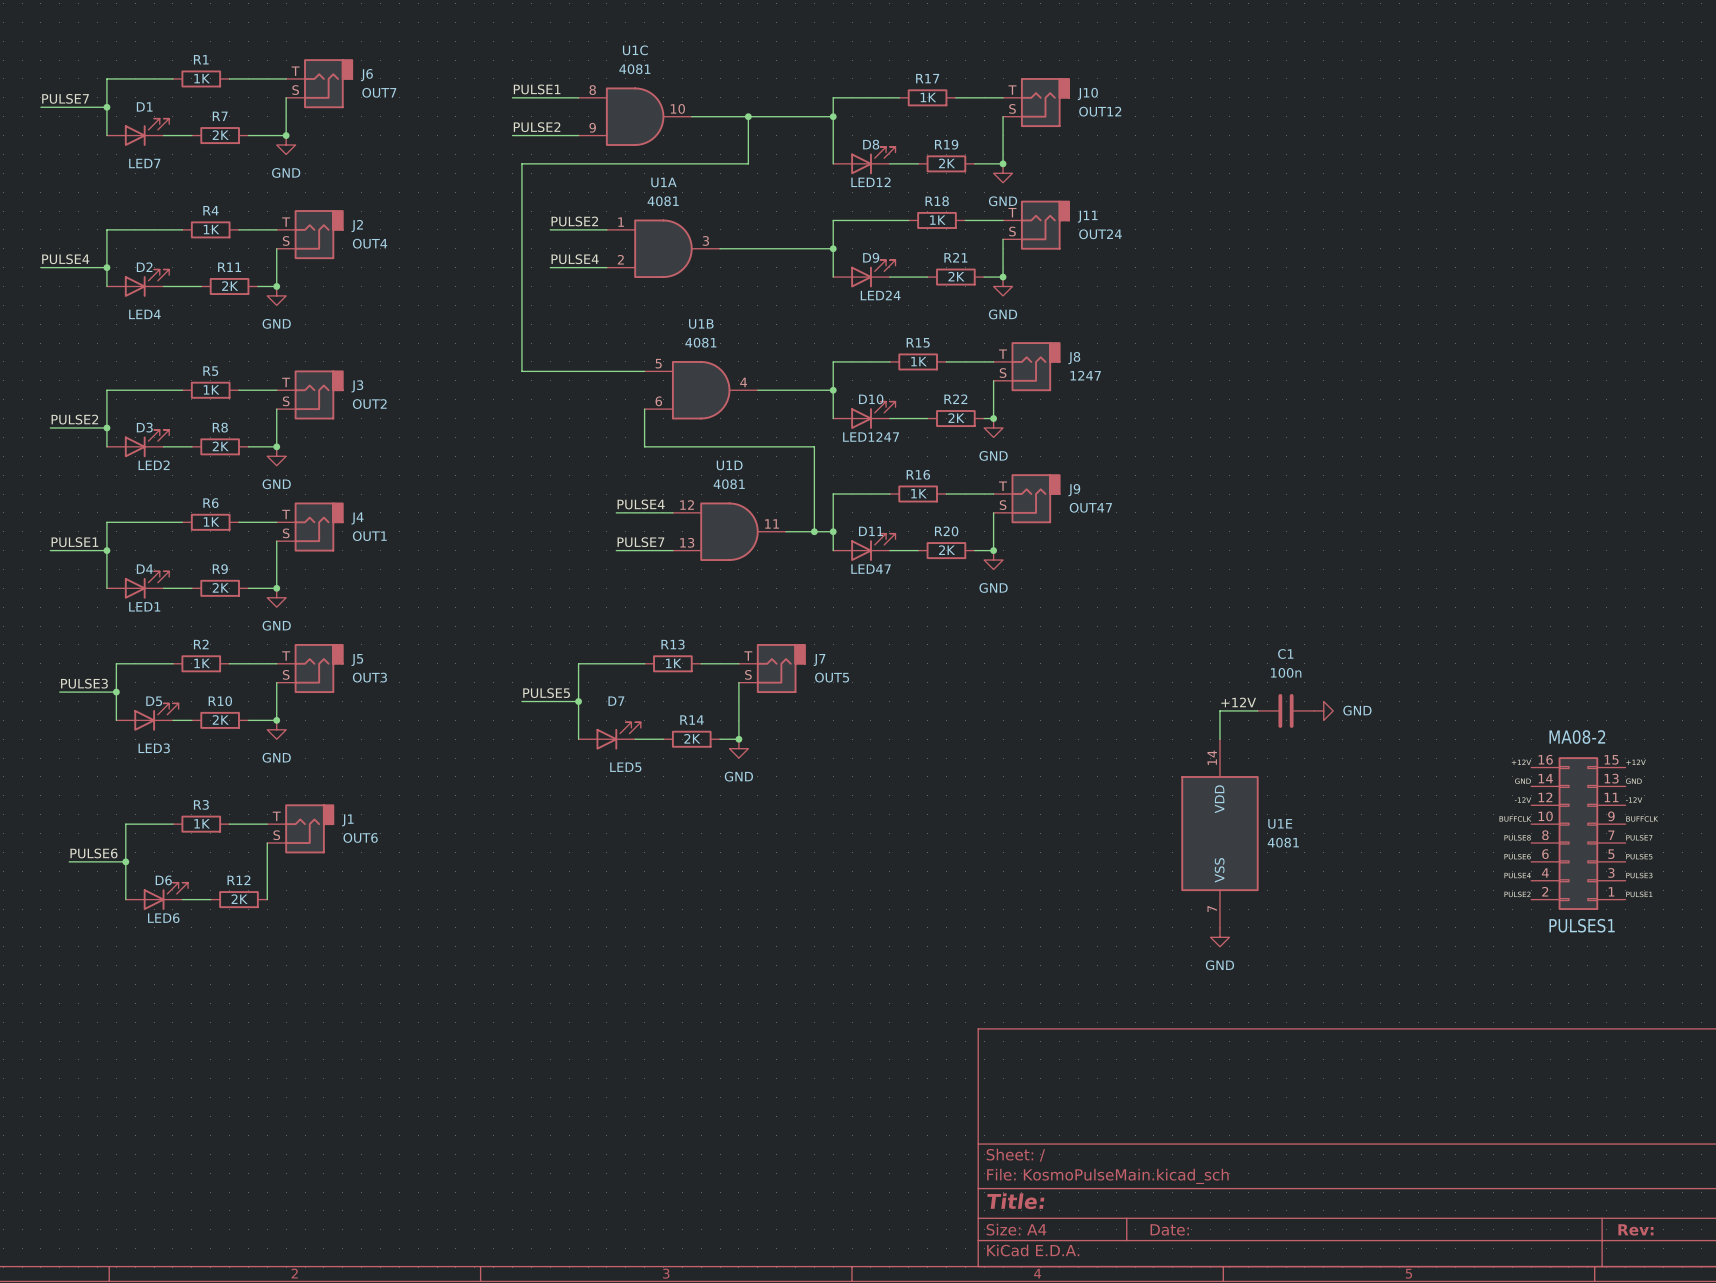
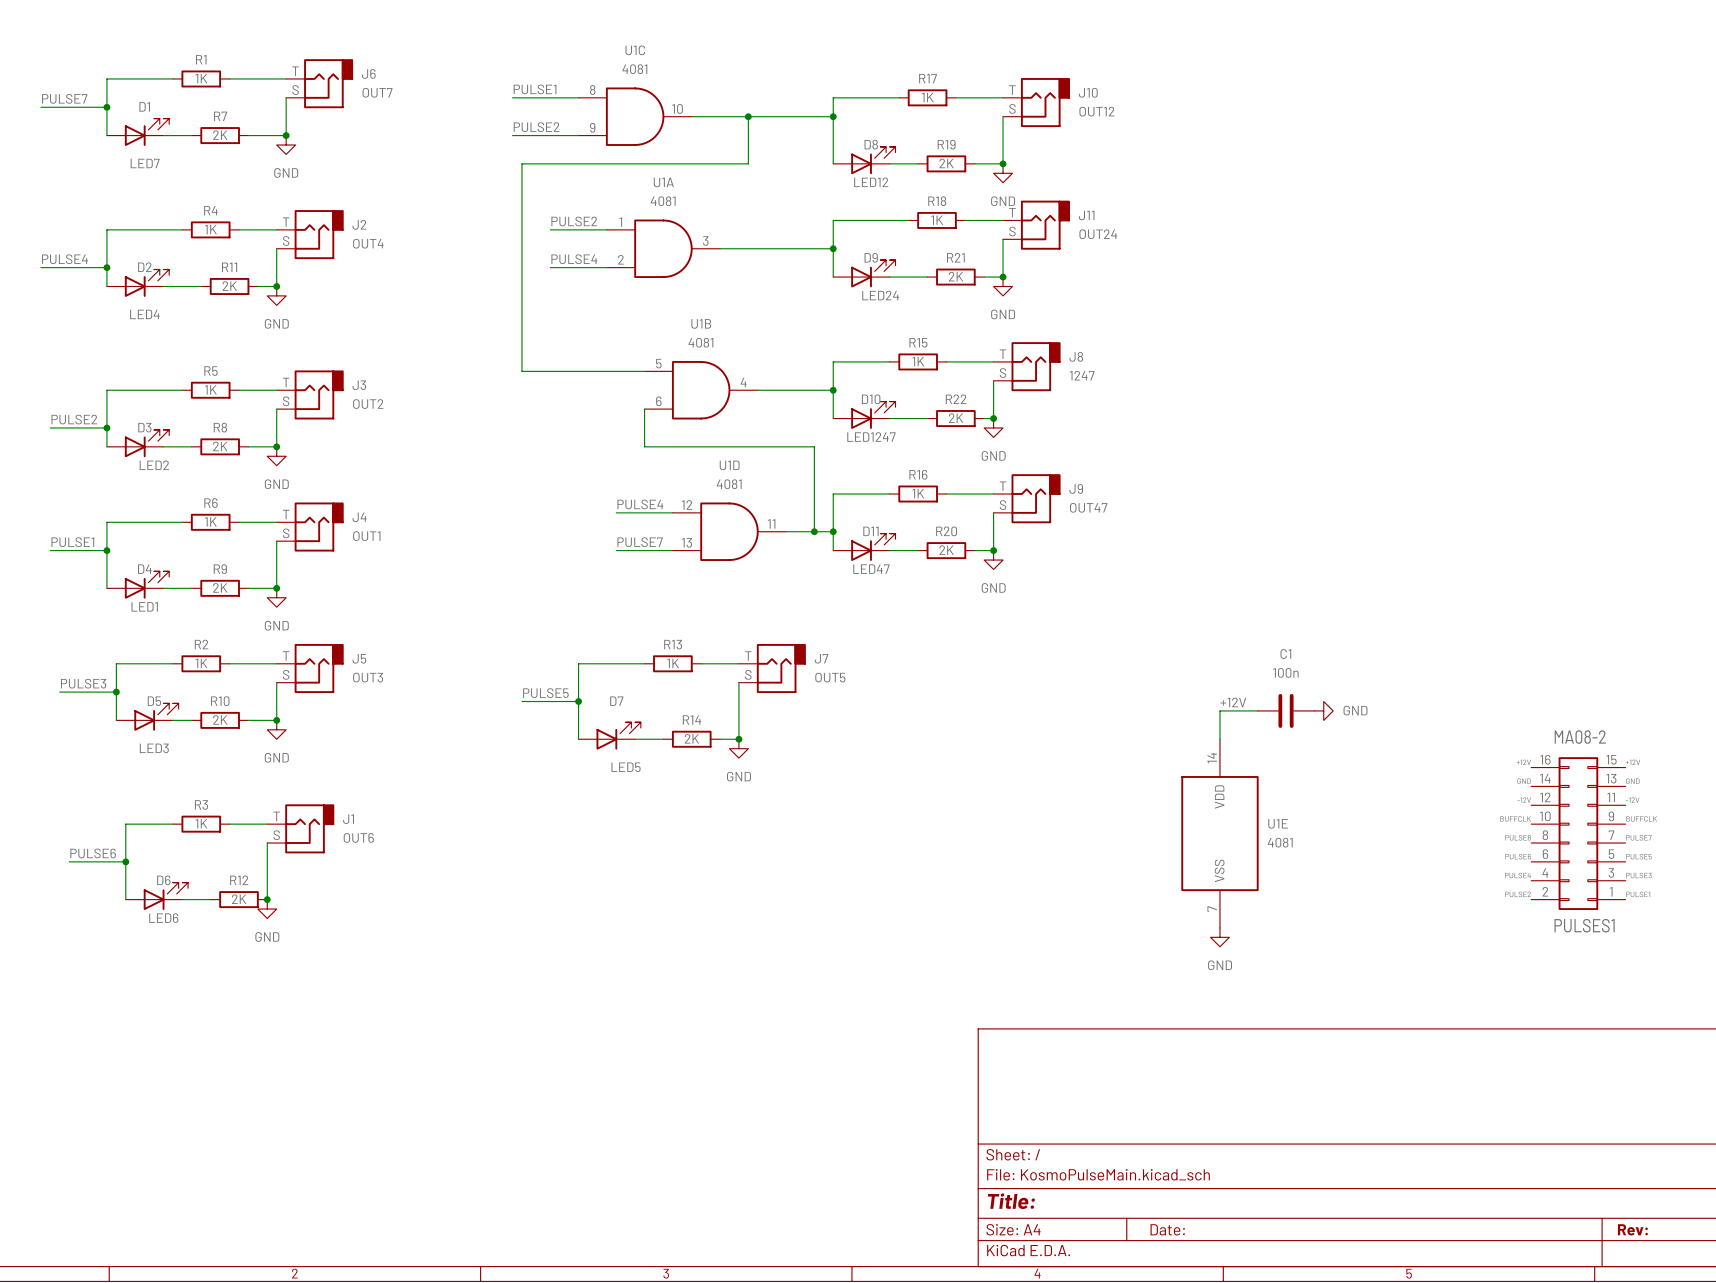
junction: none -> (267, 899)
power symbol: none -> GND (267, 909)

